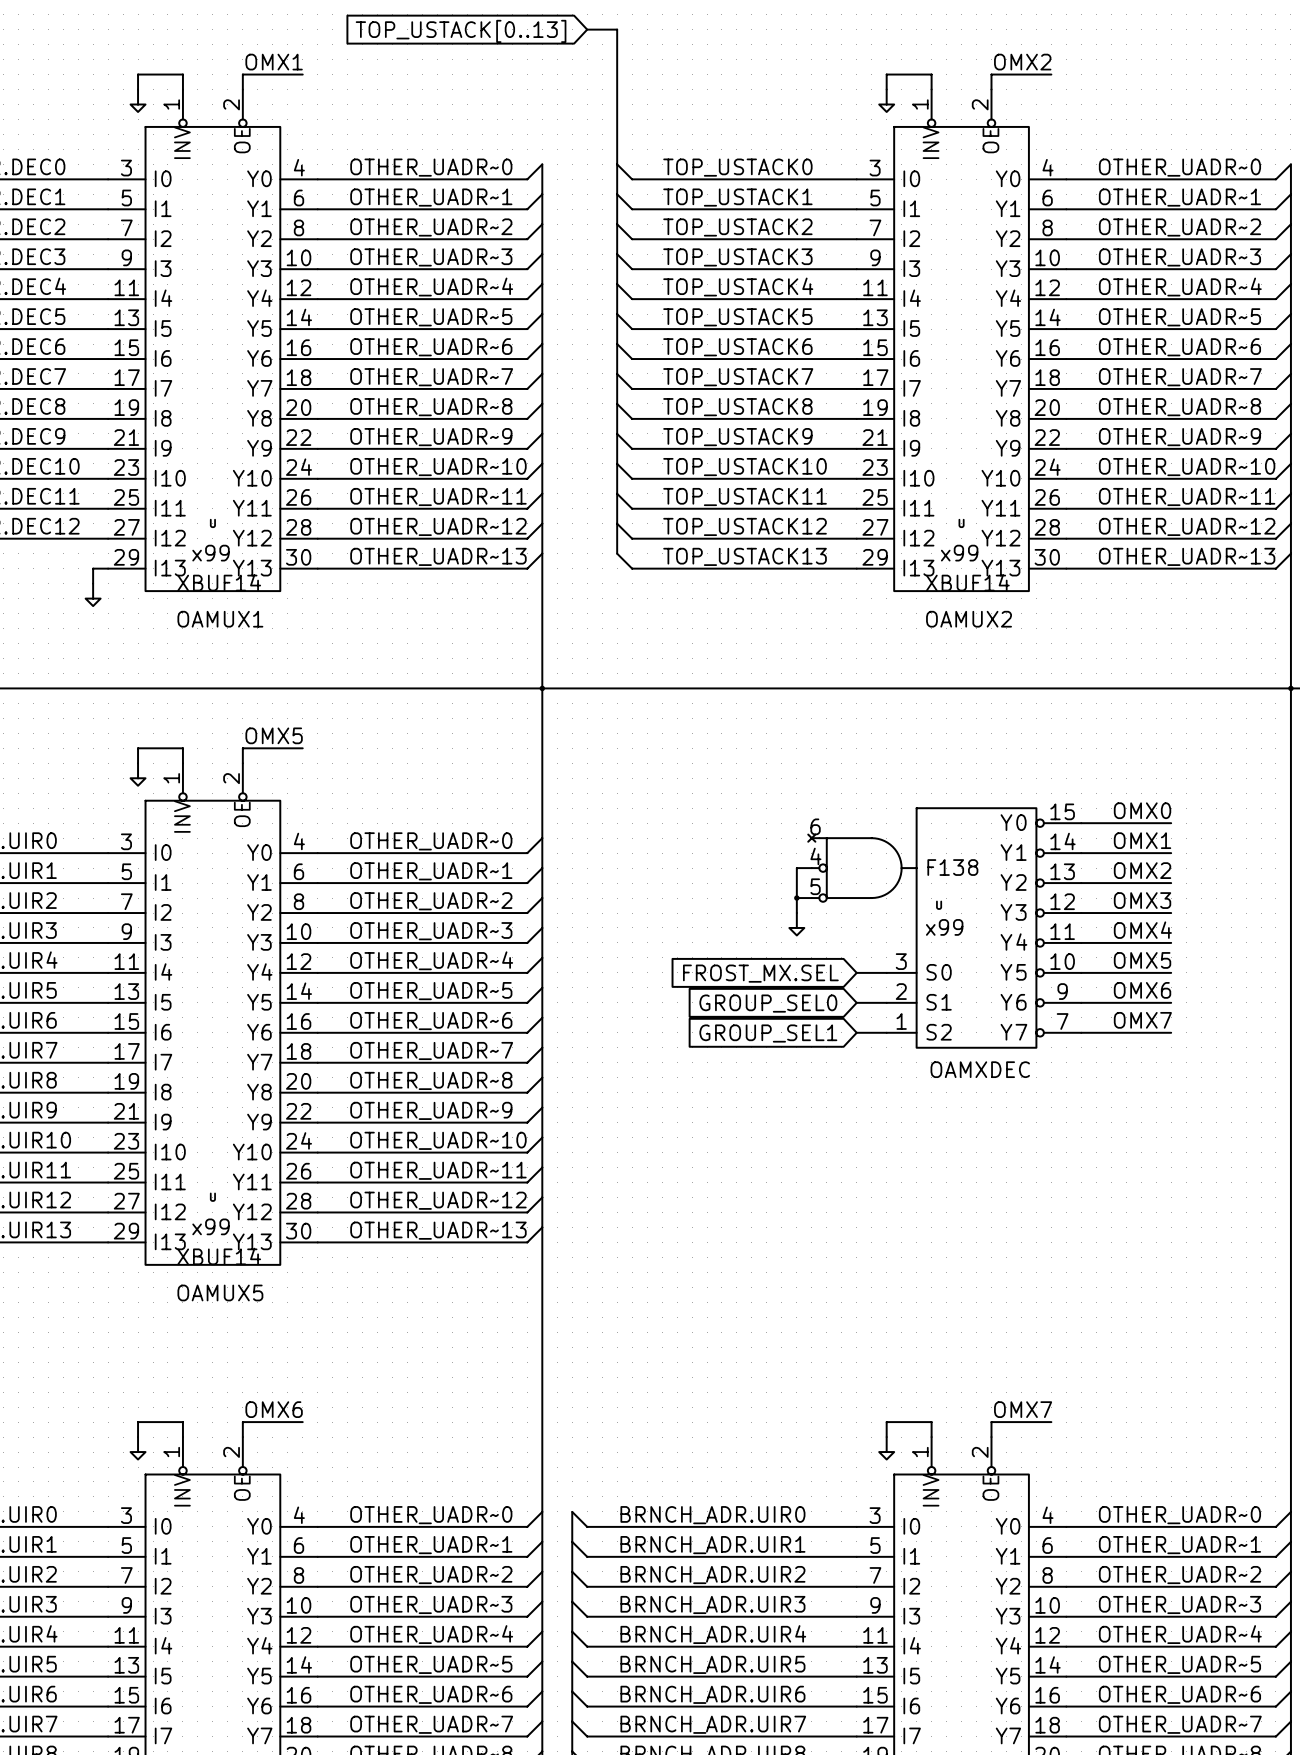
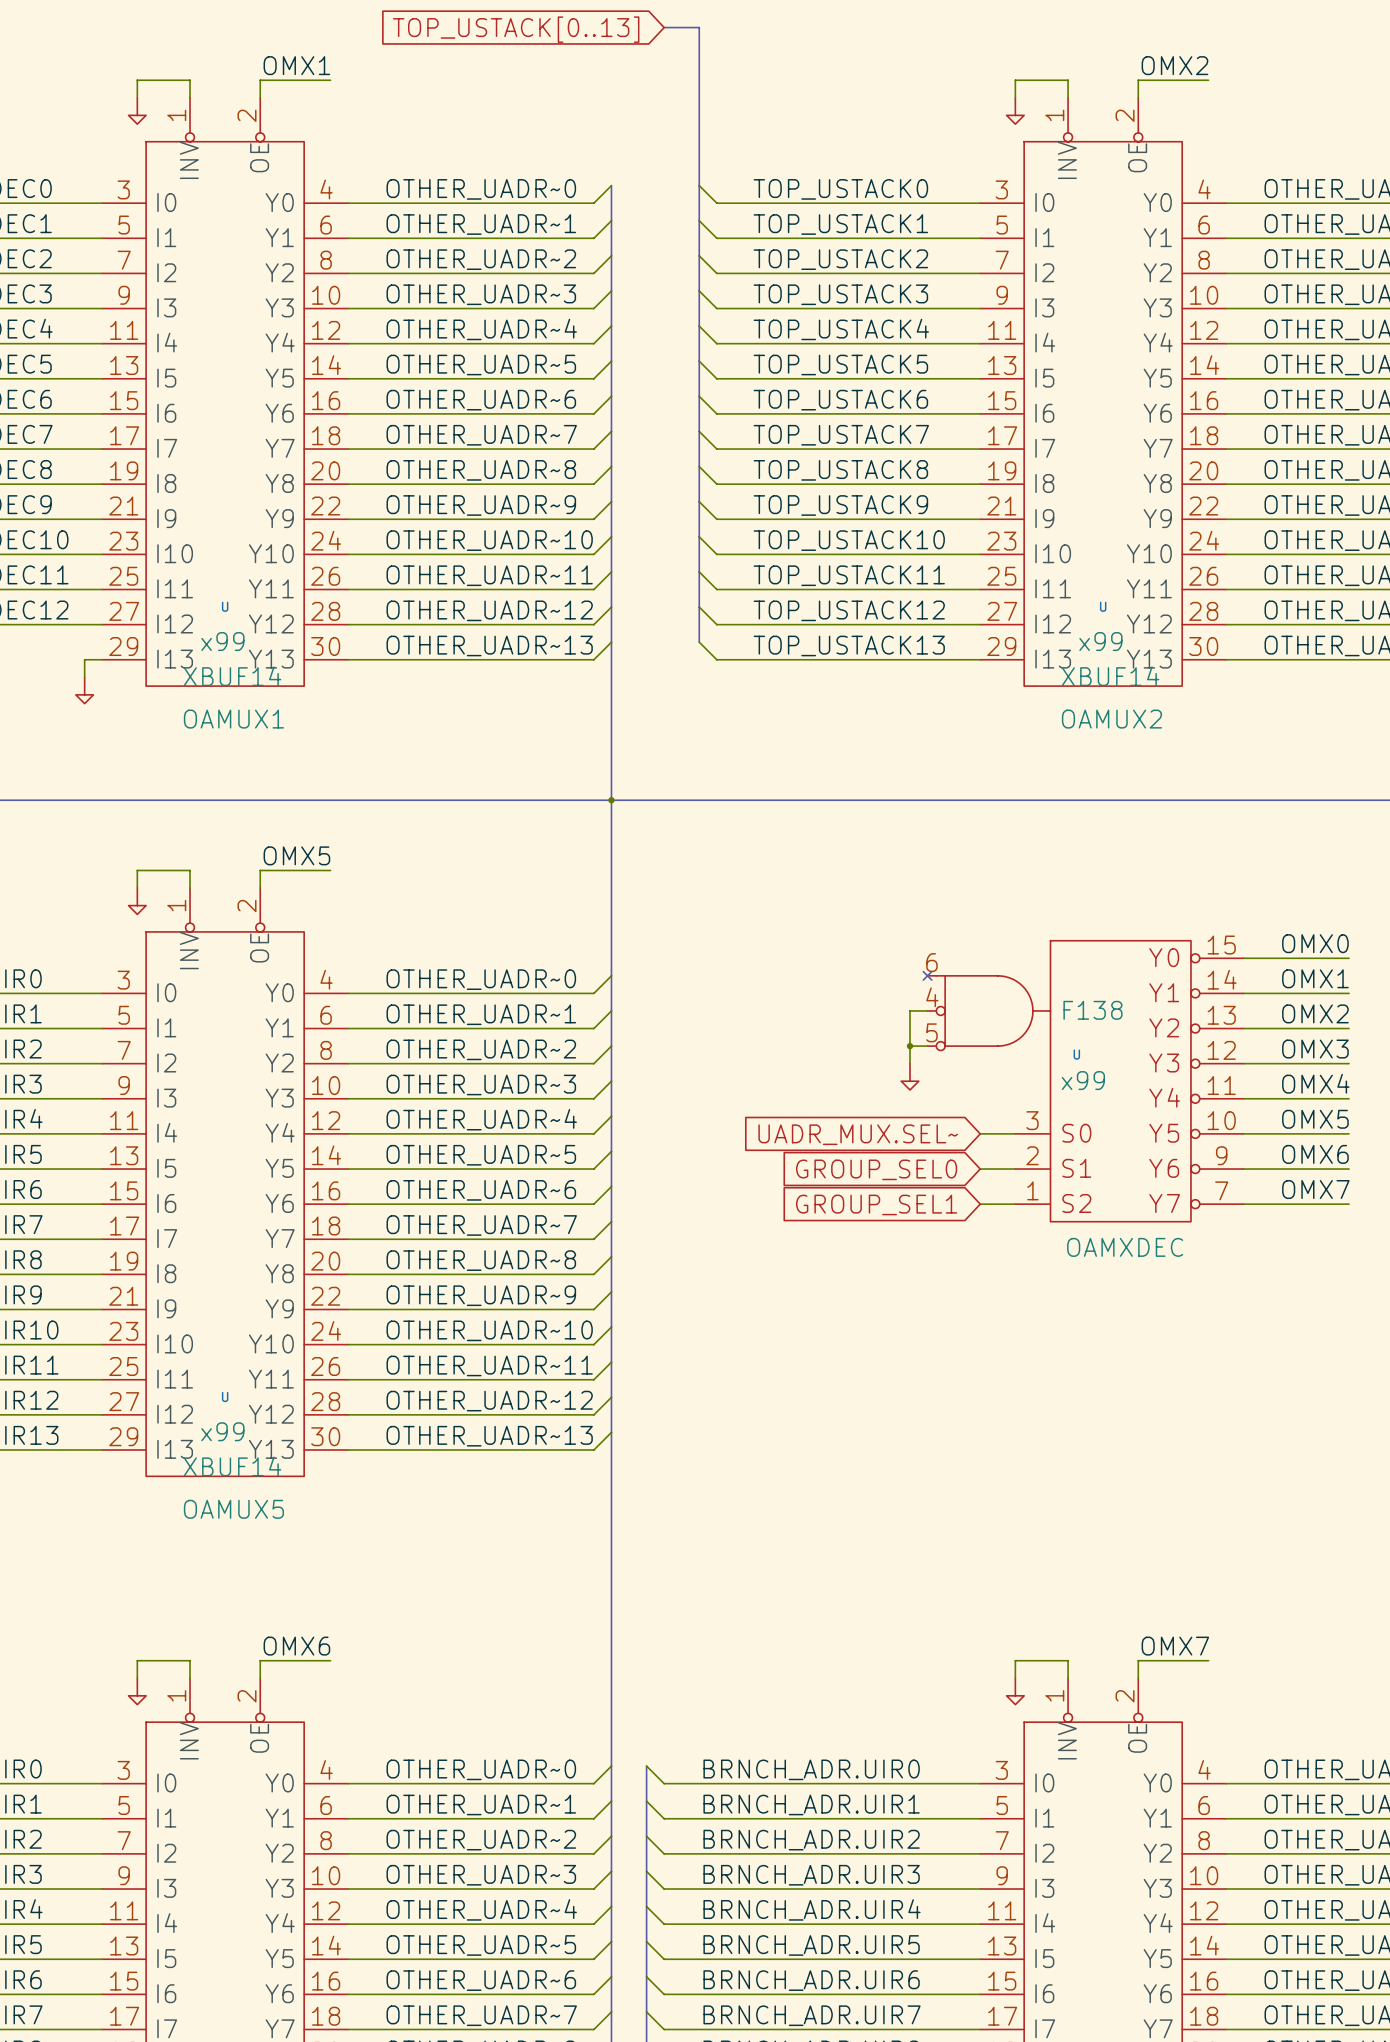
global label: FROST_MX.SEL (760, 973) -> UADR_MUX.SEL~ (858, 1134)

